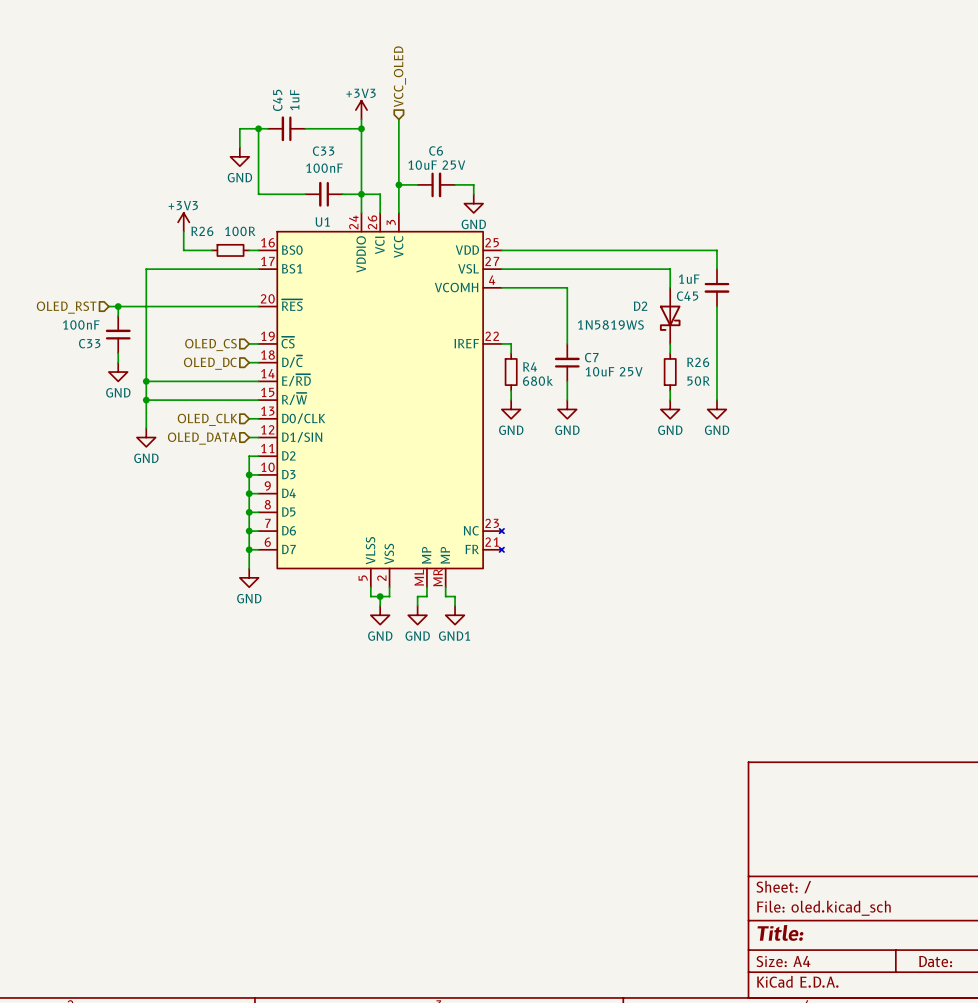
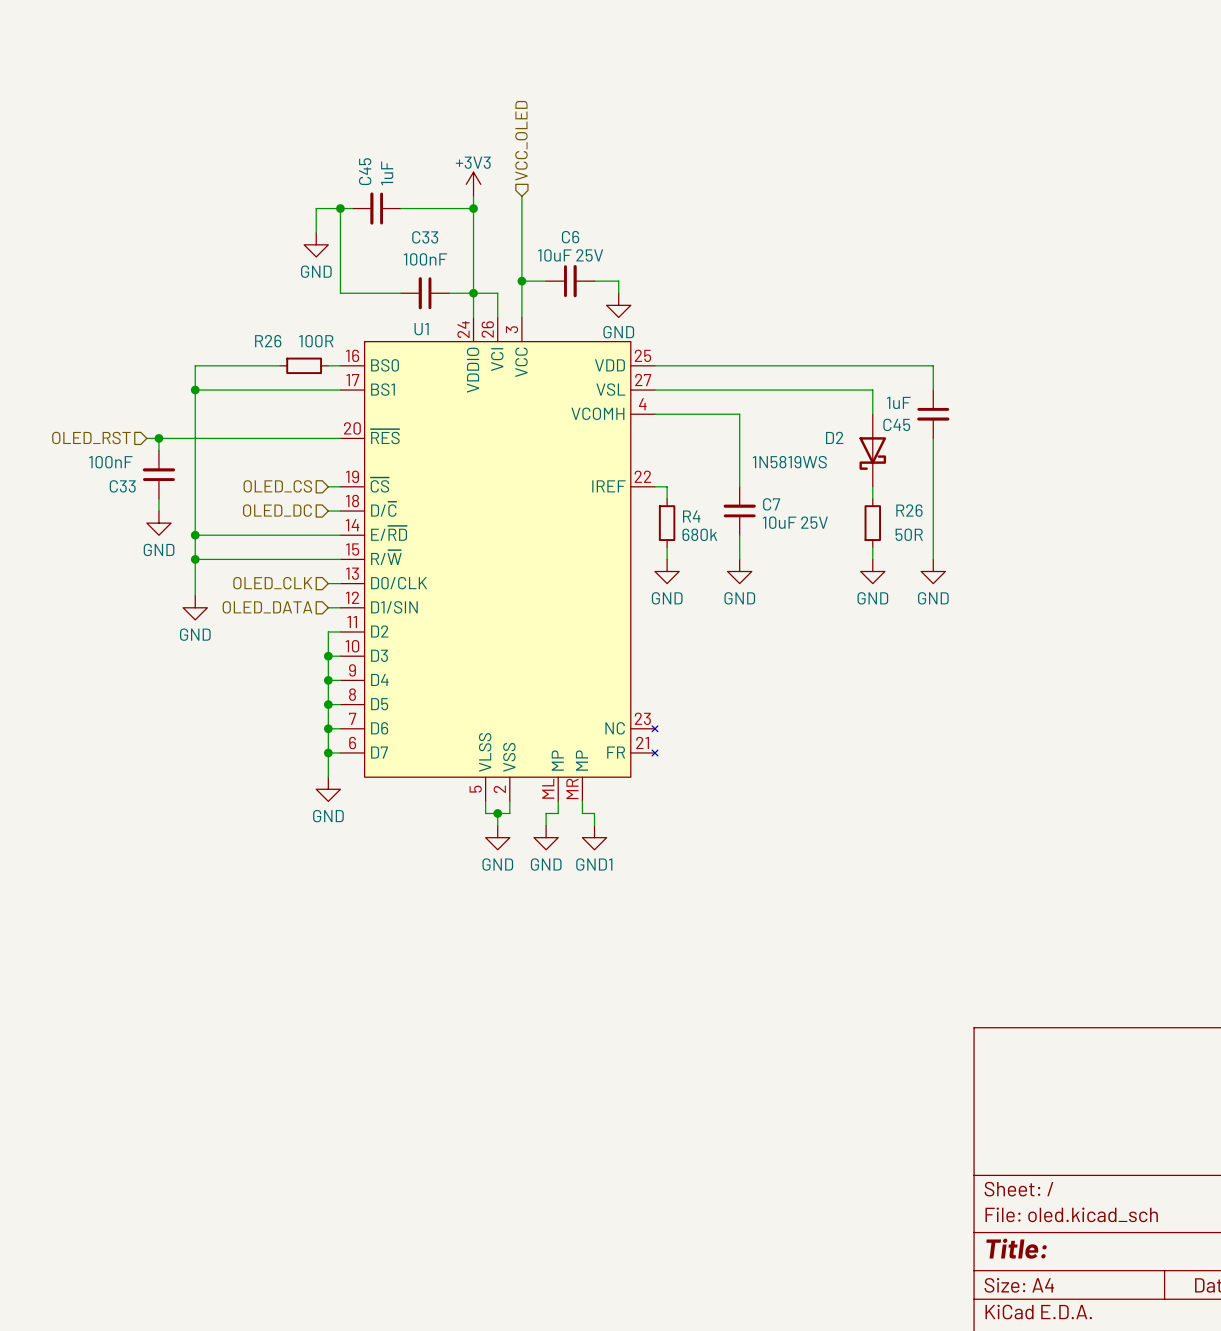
power symbol: +3V3 (183, 222) -> none
wire: (183, 231) (183, 250) -> (195, 390) (195, 365) (243, 365)
junction: none -> (195, 390)

